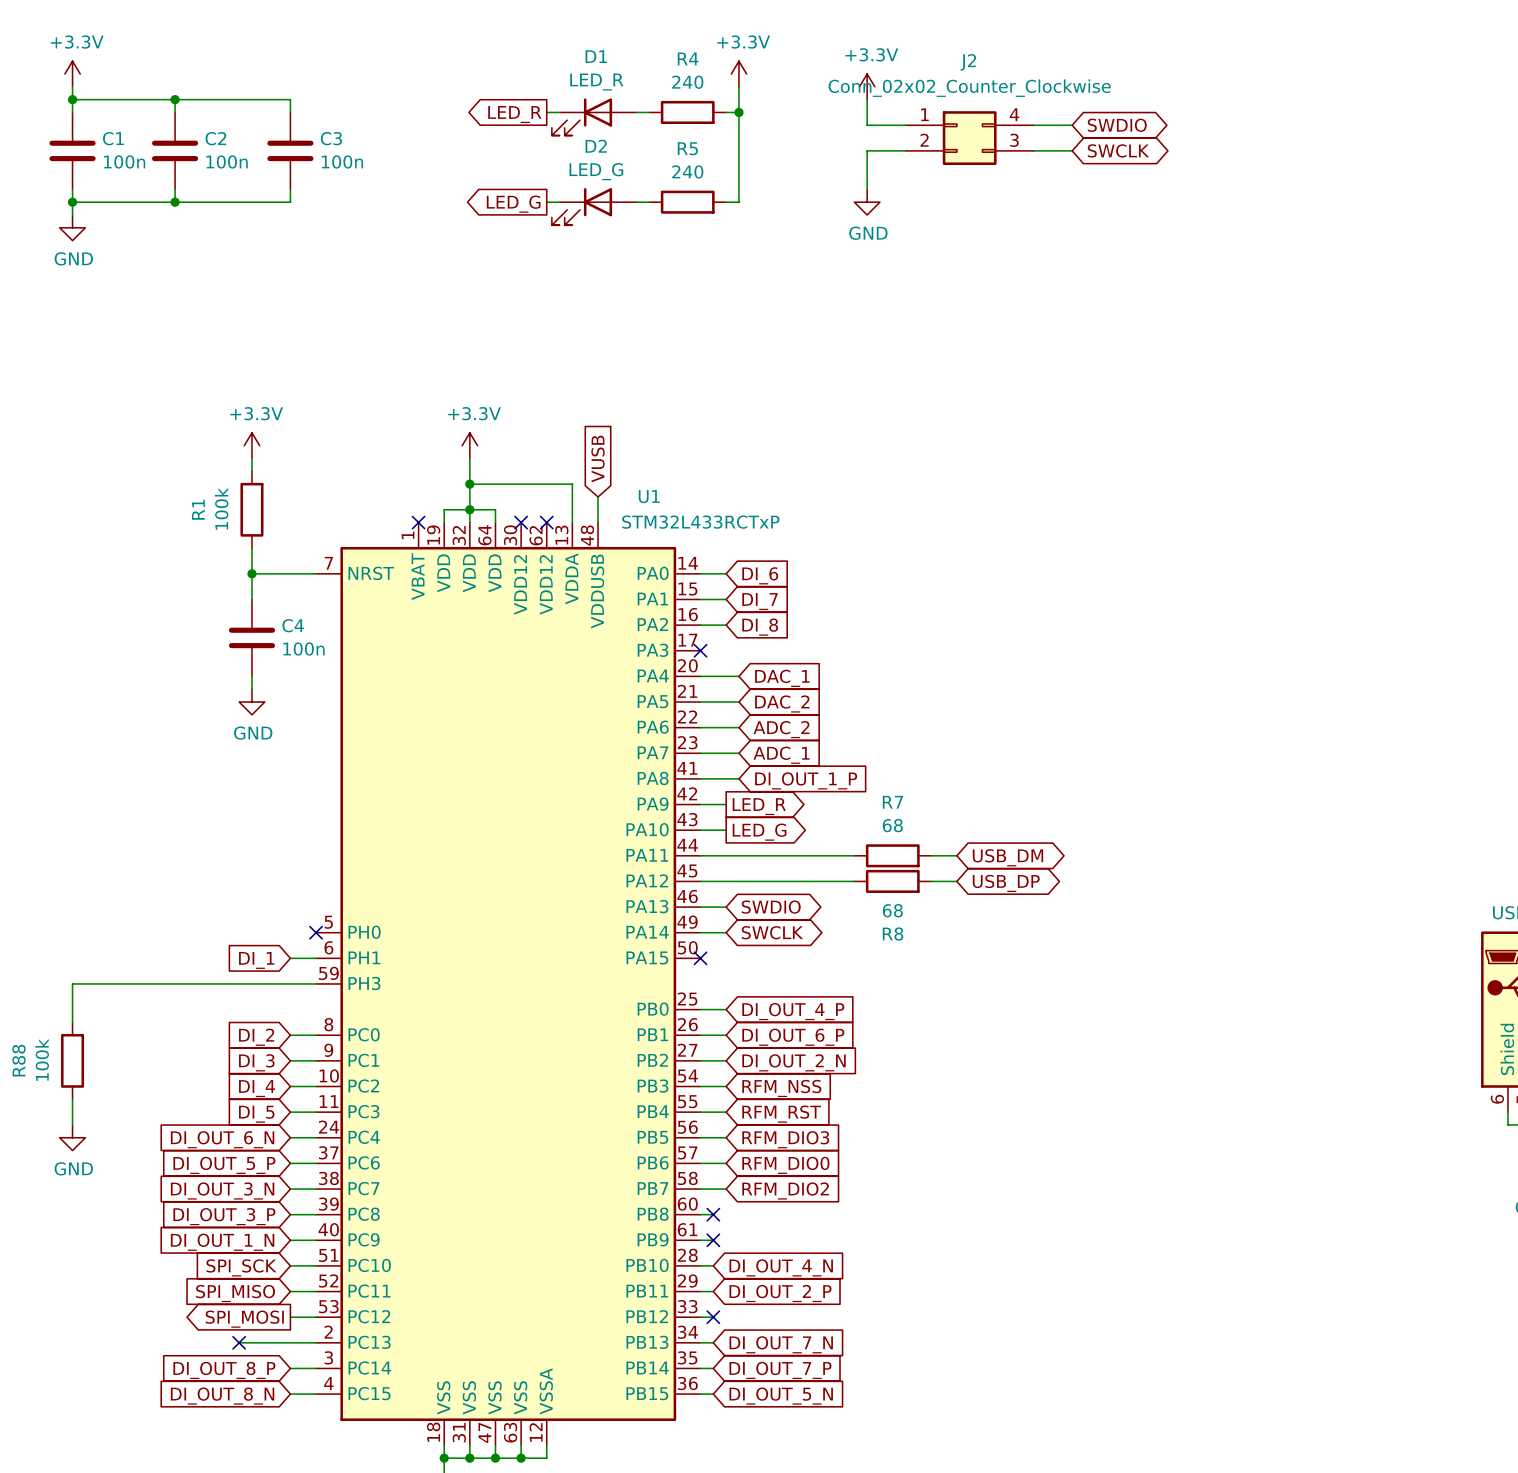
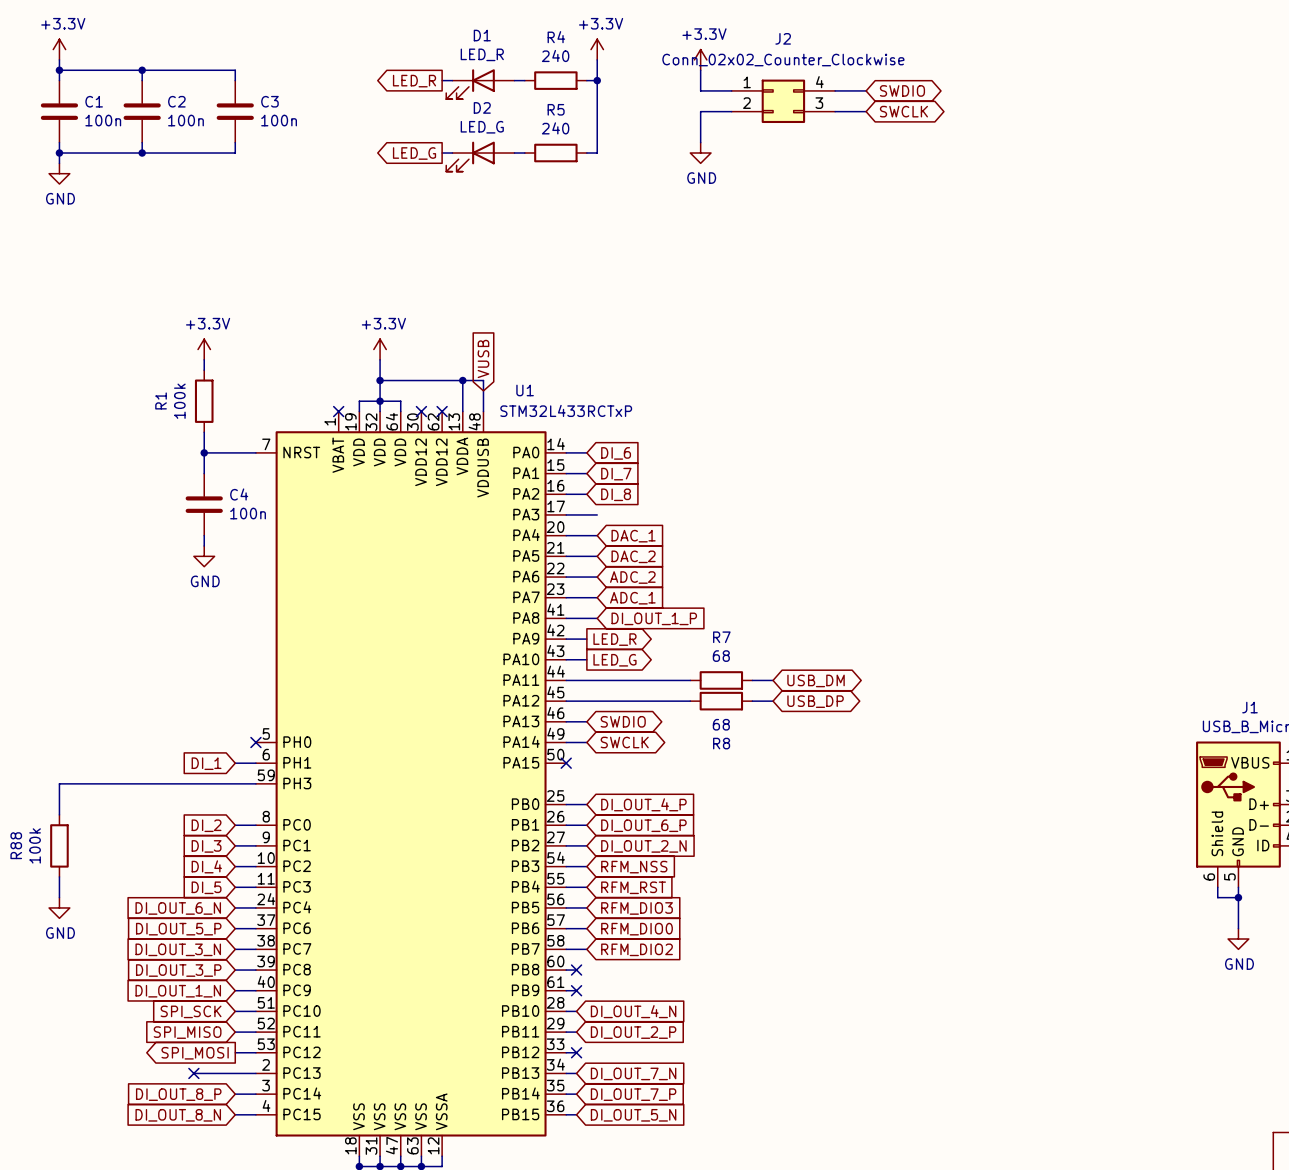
wire: none -> (462, 380) (483, 380) (483, 390)
junction: none -> (462, 380)
wire: none -> (566, 514) (597, 514)
no-connect mark: (700, 650) -> none

